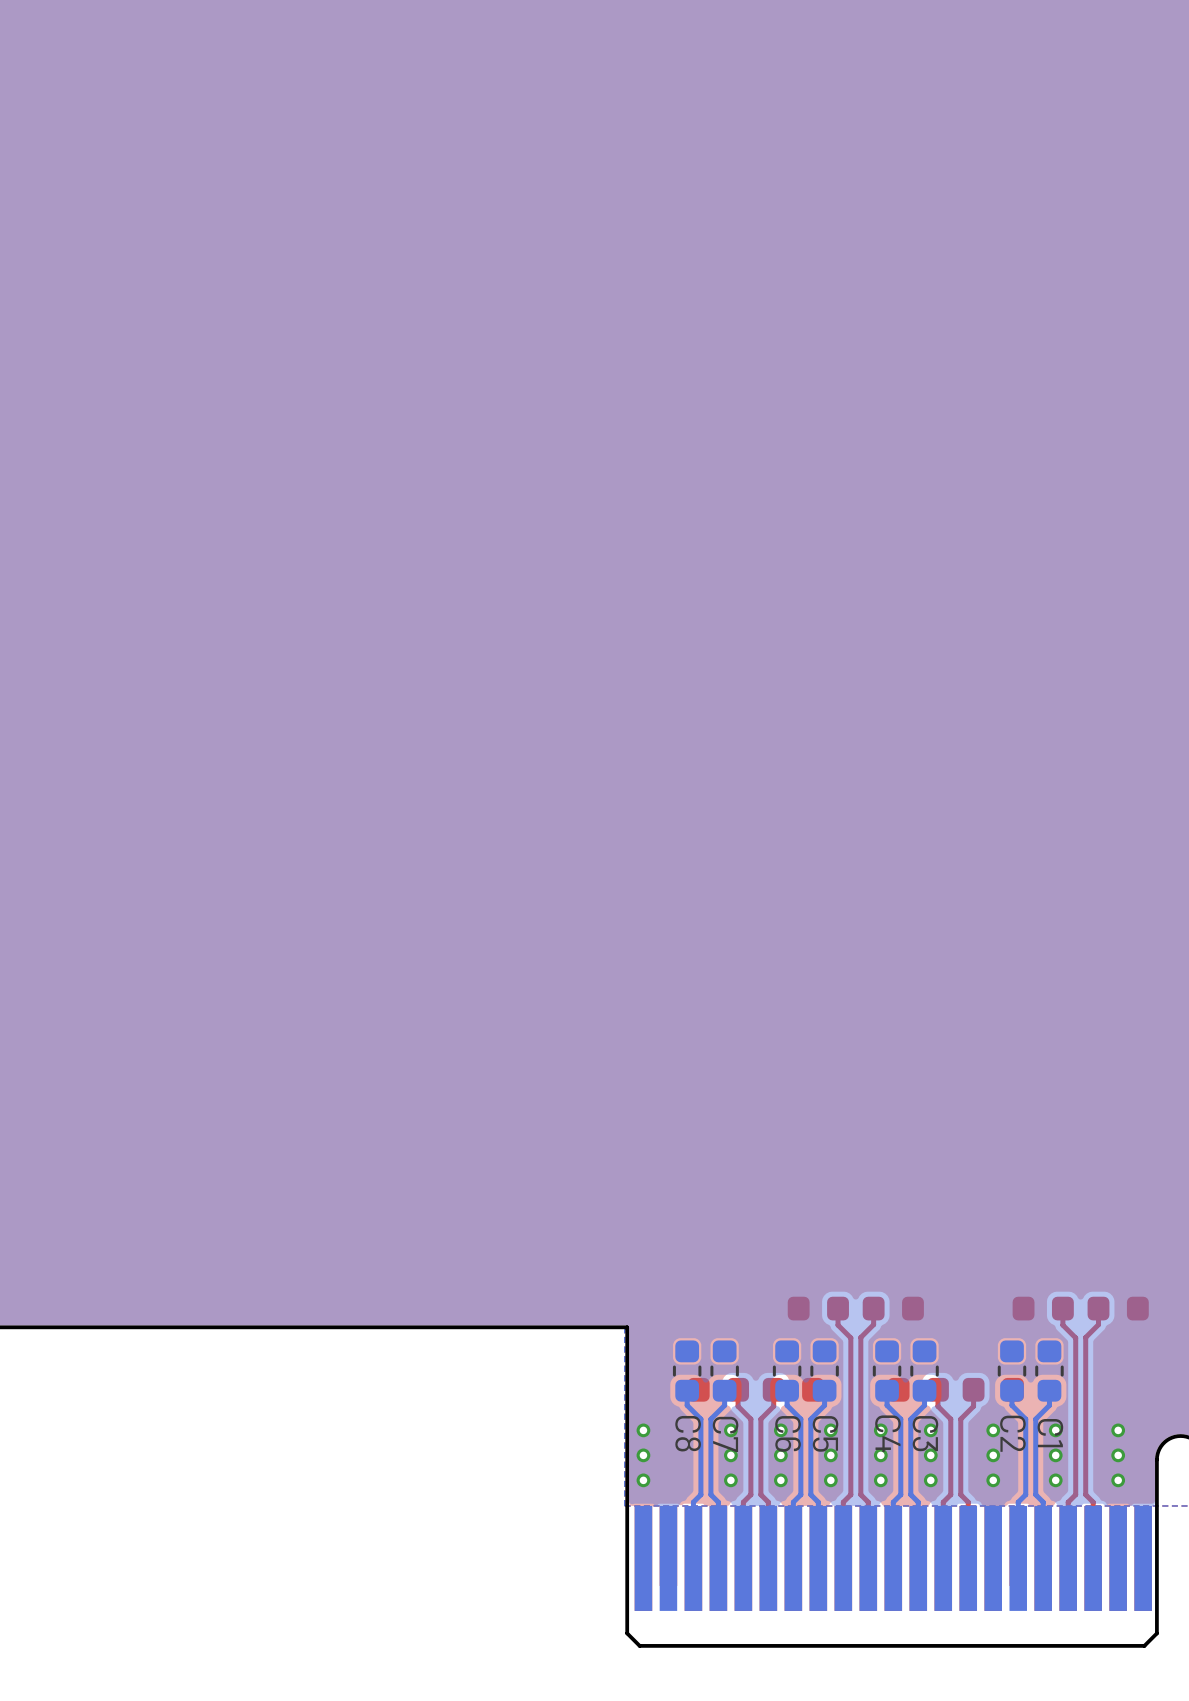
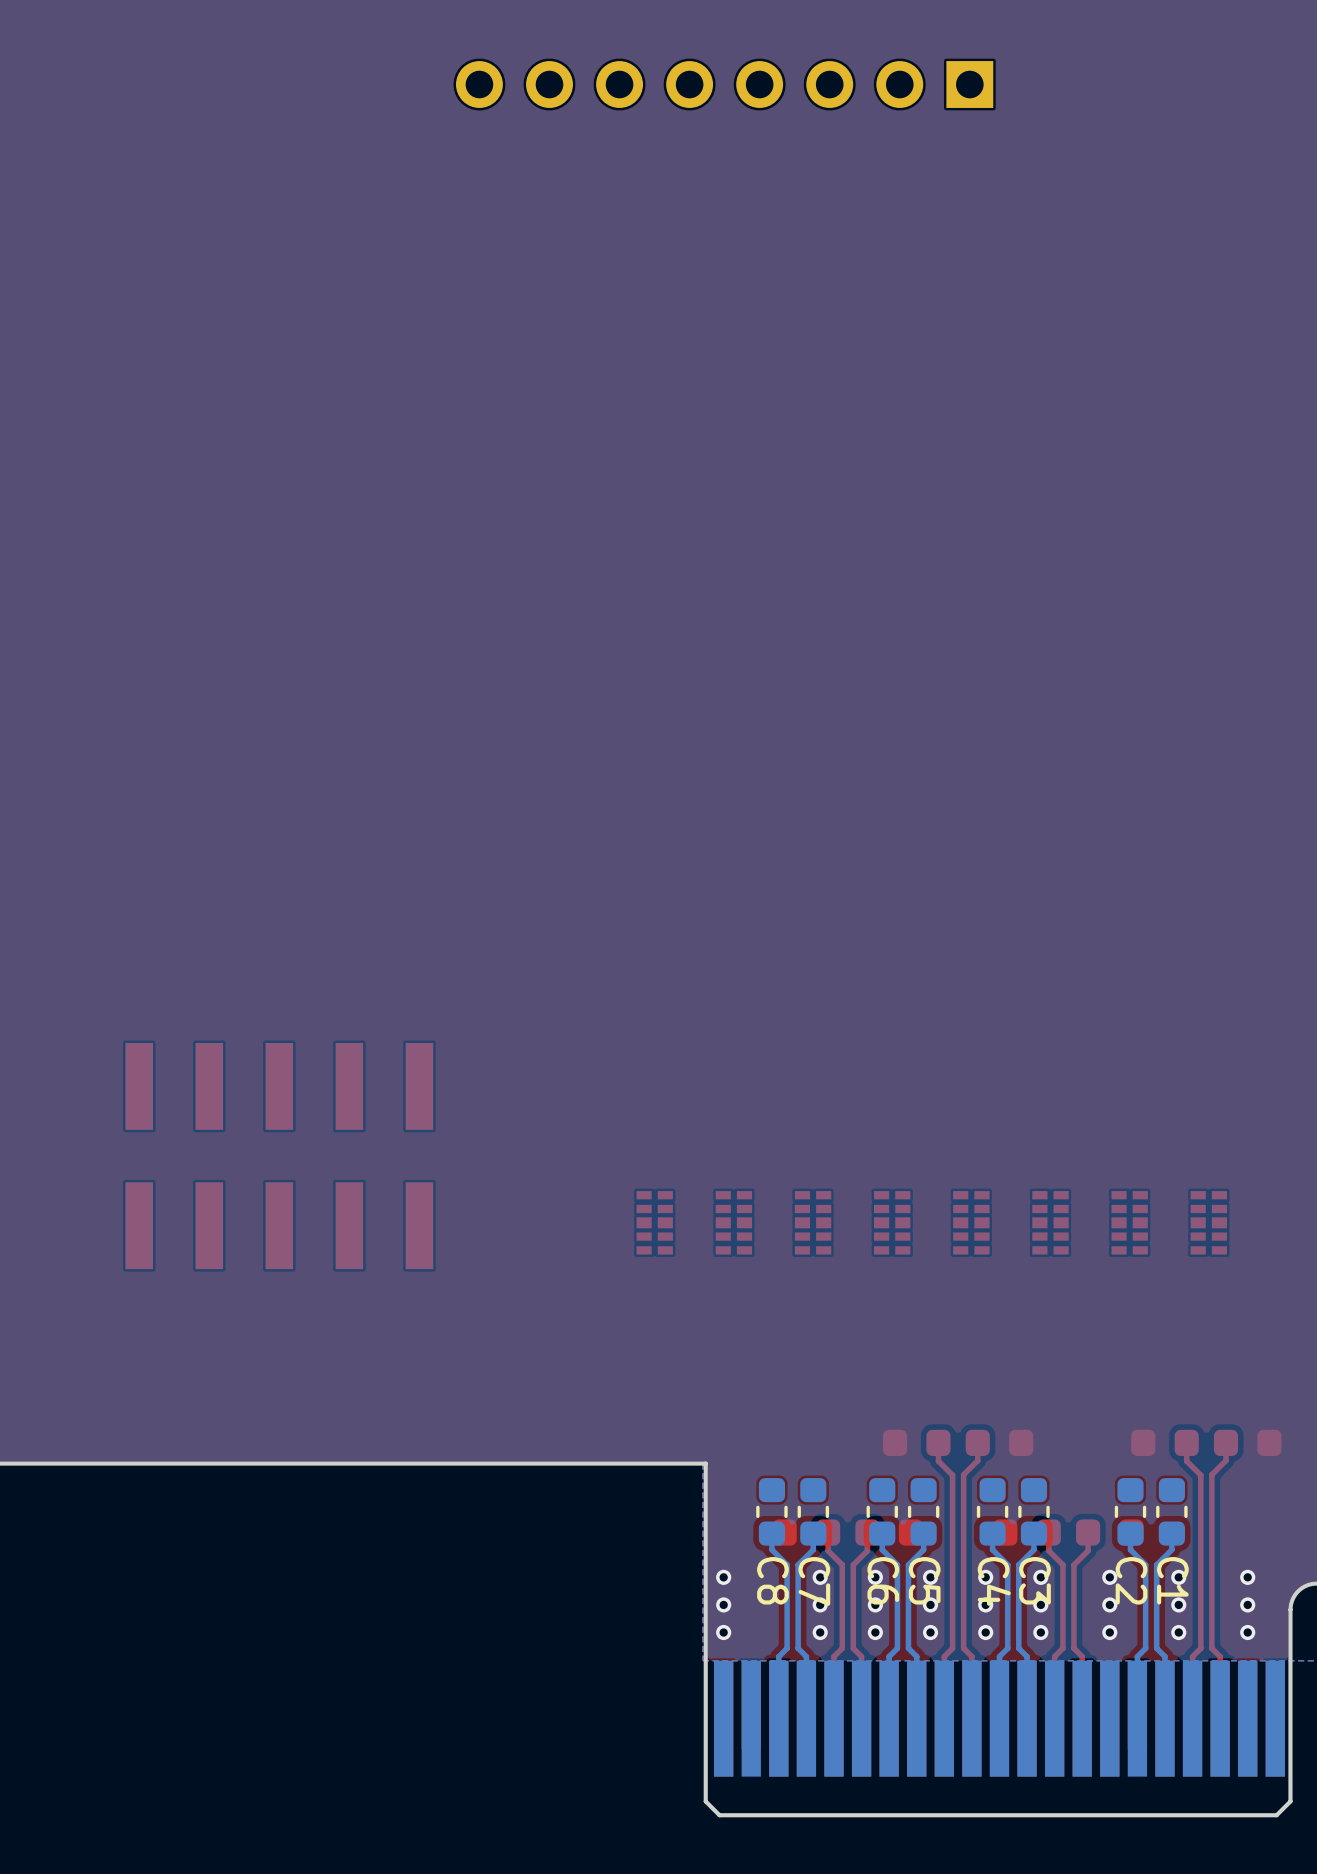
part: none -> (724, 84)
part: none -> (279, 1156)
part: none -> (654, 1222)
part: none -> (733, 1222)
part: none -> (813, 1222)
part: none -> (892, 1222)
part: none -> (971, 1222)
part: none -> (1050, 1222)
part: none -> (1129, 1222)
part: none -> (1208, 1222)

